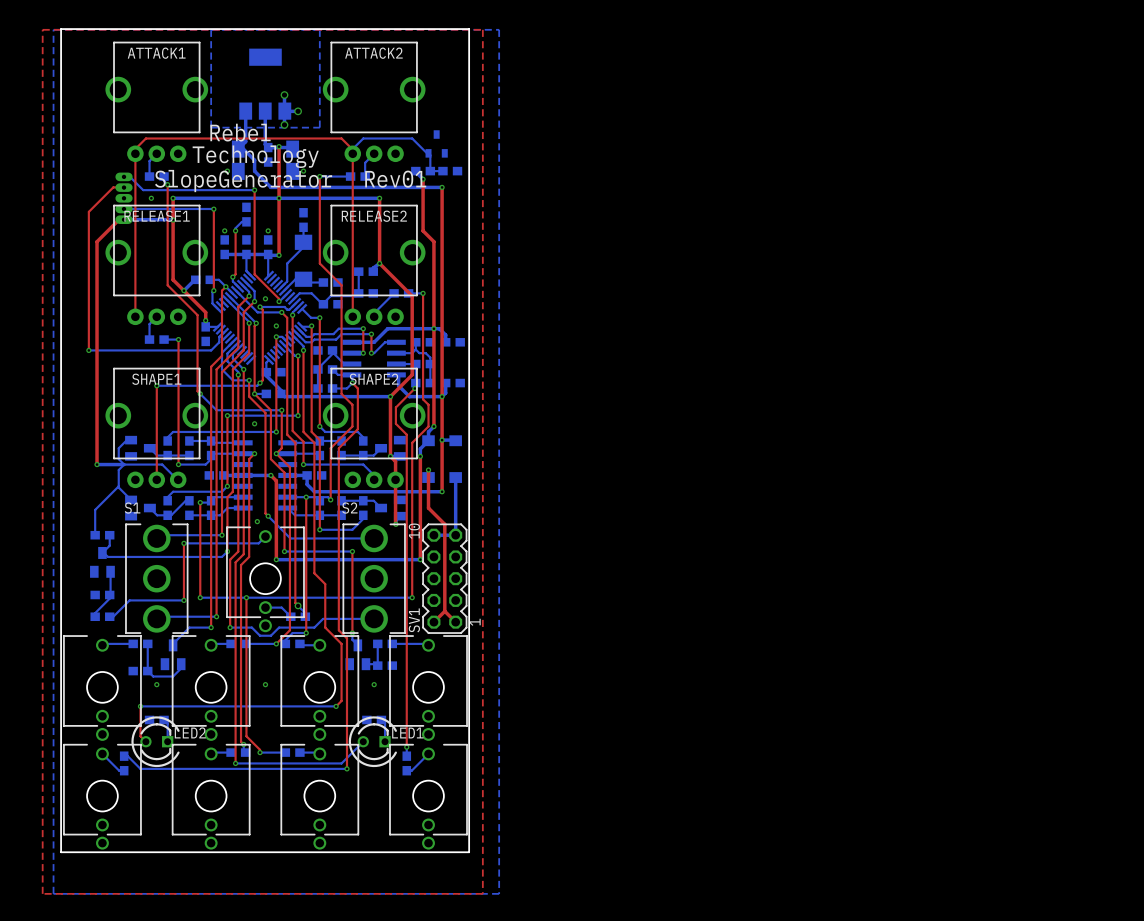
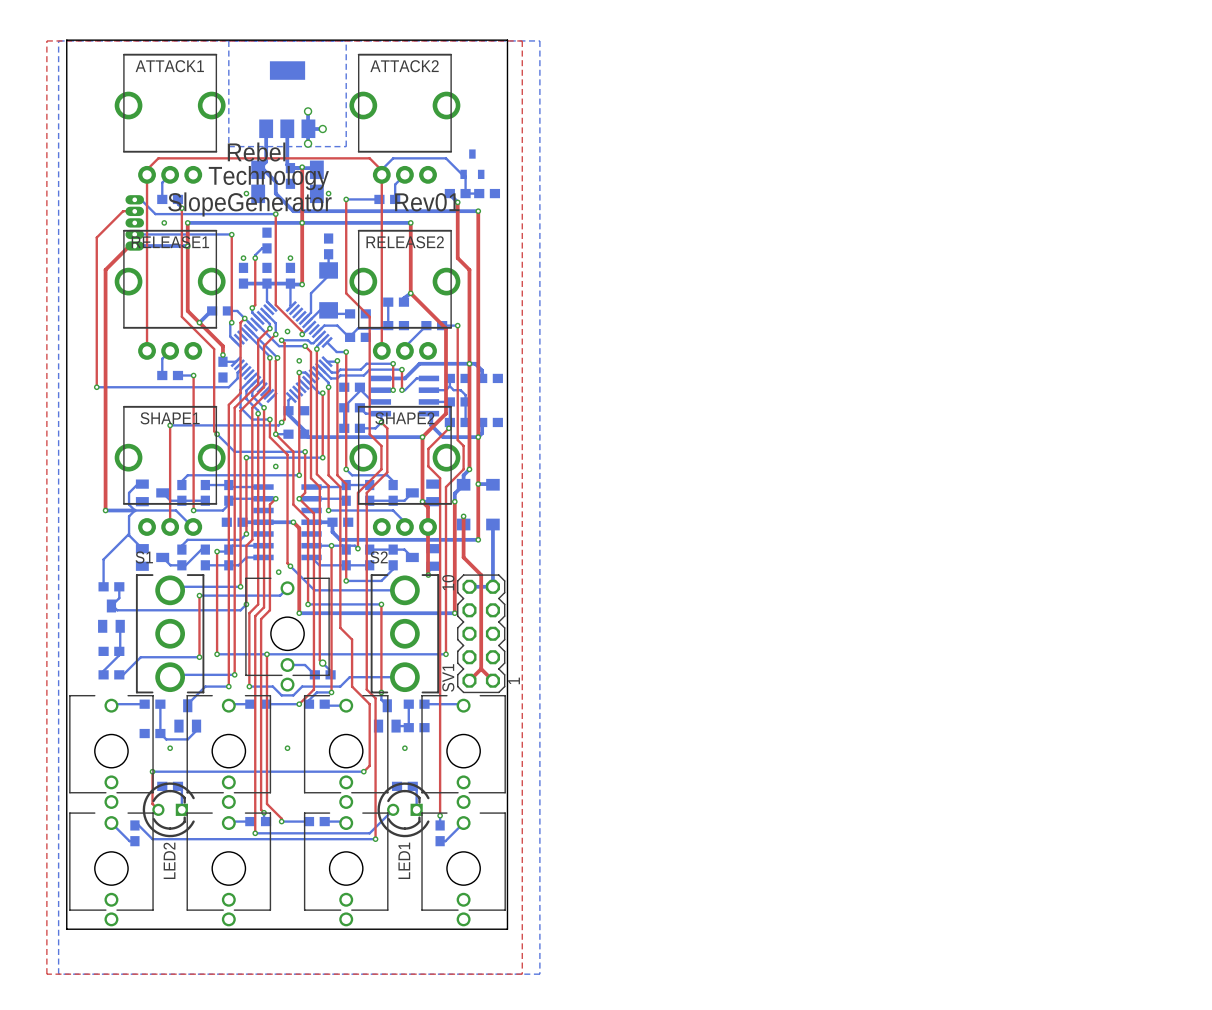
LED2 name rotation: 0° (190, 732) -> 90° counterclockwise (169, 860)
LED2 name position: LED2 (190, 732) -> LED2 (169, 860)
LED1 name rotation: 0° (407, 733) -> 90° counterclockwise (404, 860)
LED1 name position: LED1 (407, 733) -> LED1 (404, 860)

